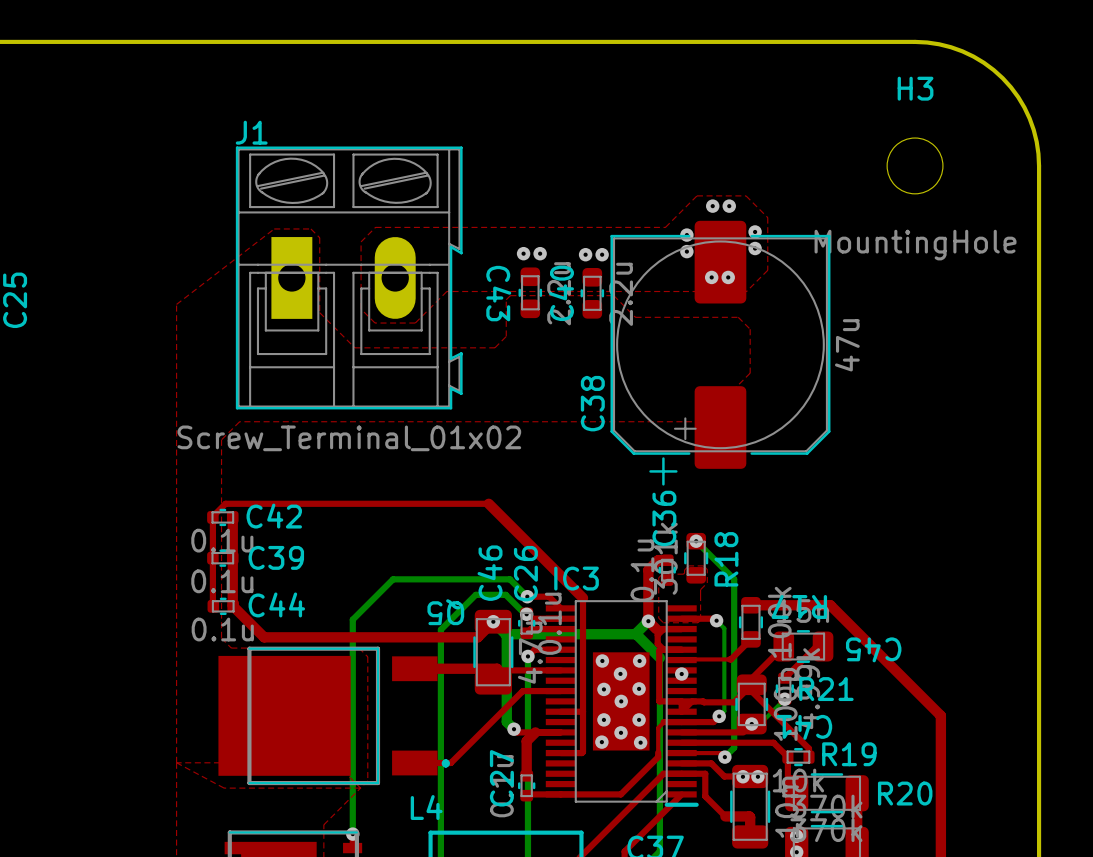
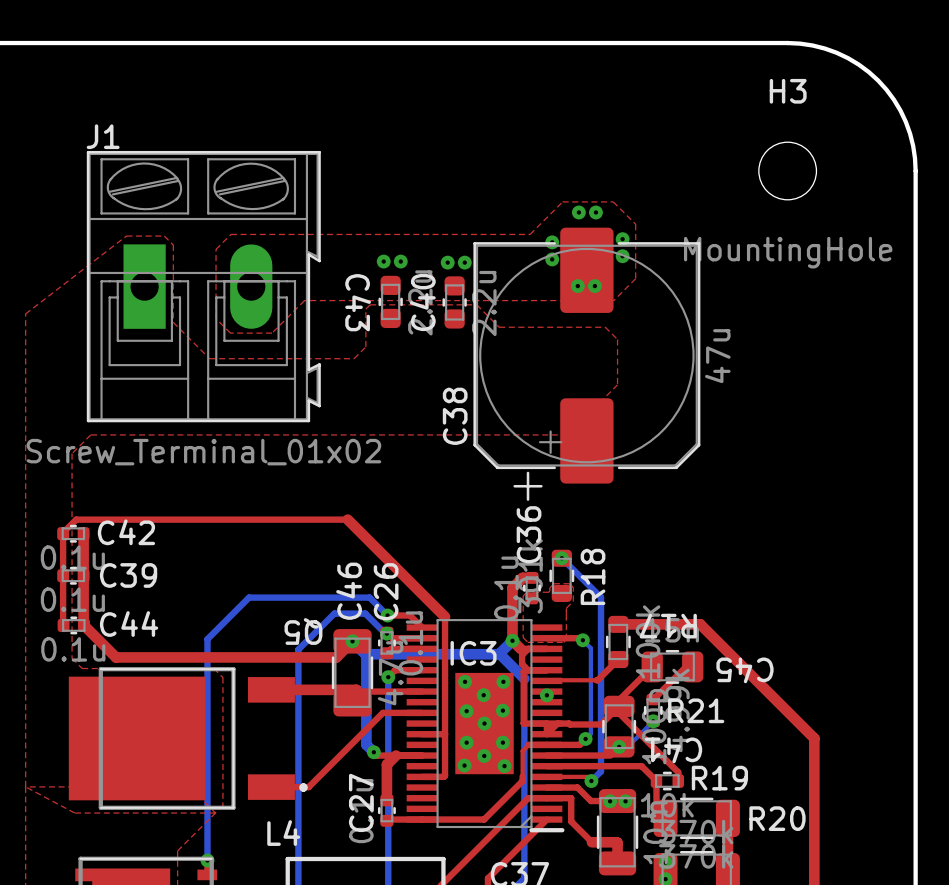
IC3 name position: IC3 (576, 578) -> IC3 (473, 653)

